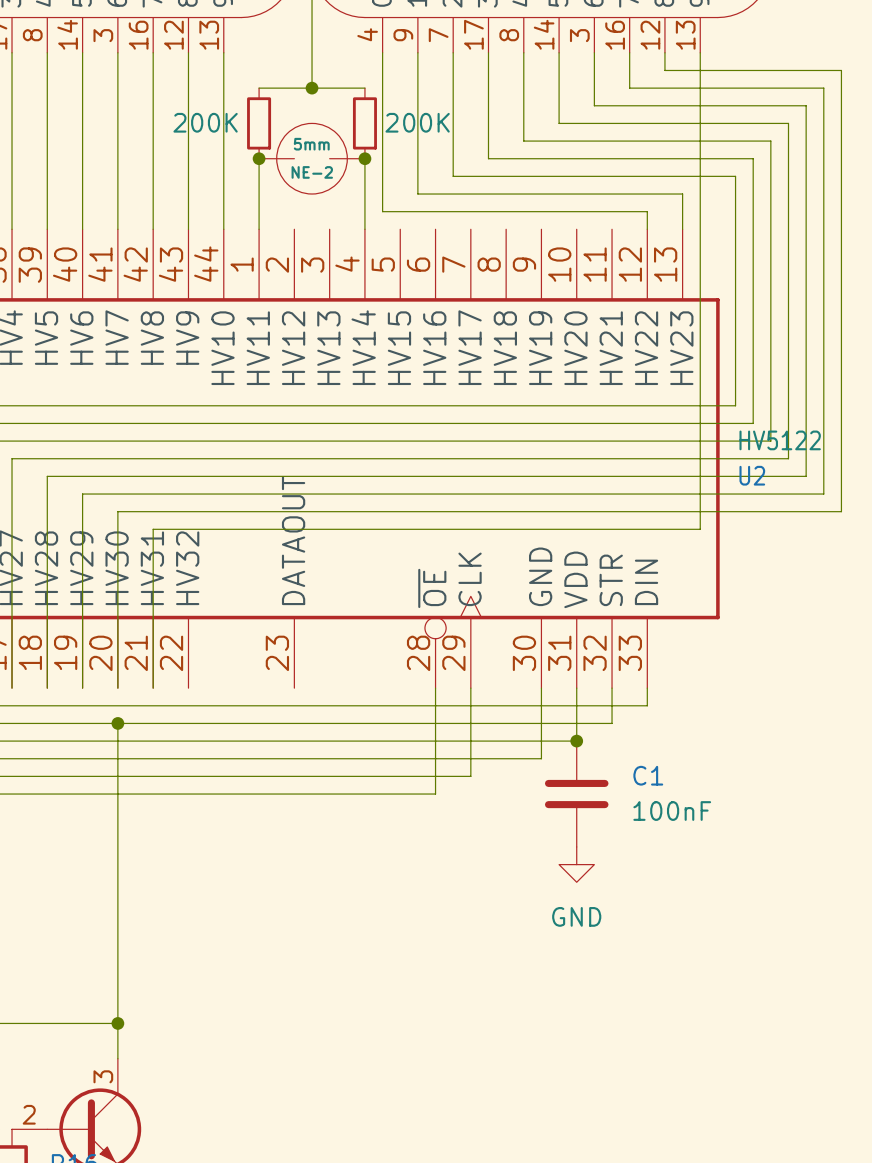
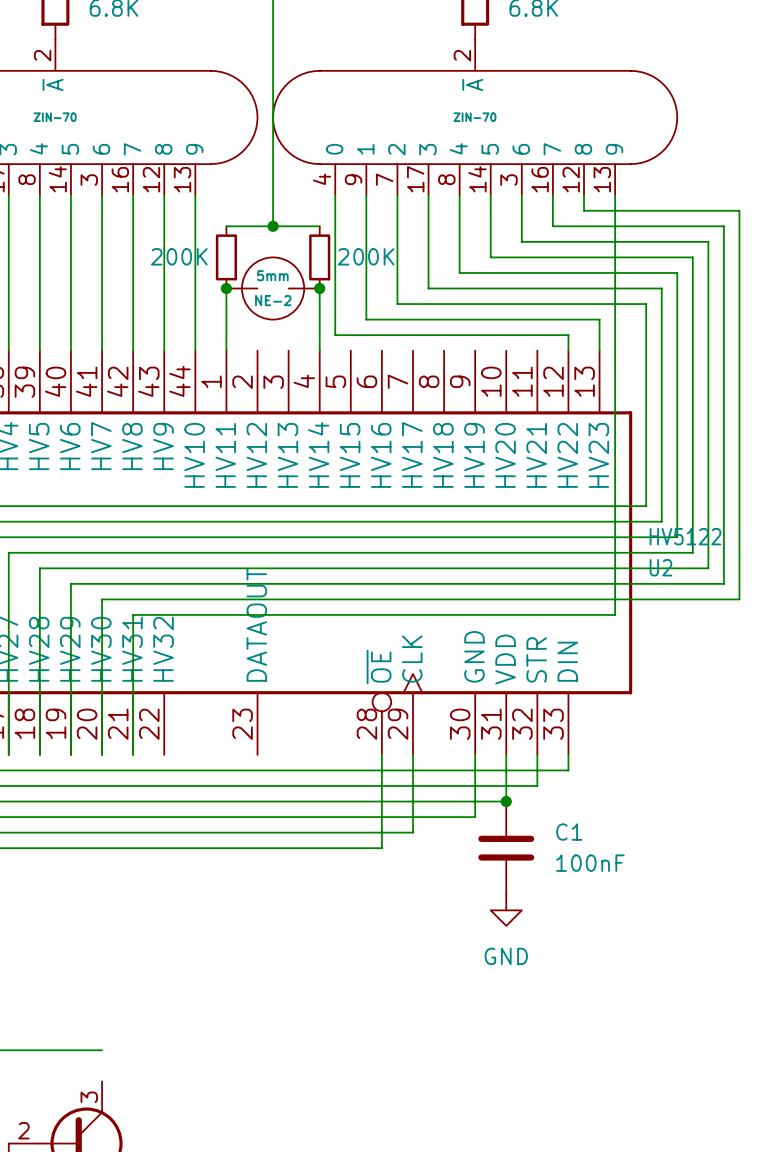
wire: (117, 723) (117, 1058) -> none
junction: (117, 723) -> none
junction: (117, 1023) -> none

